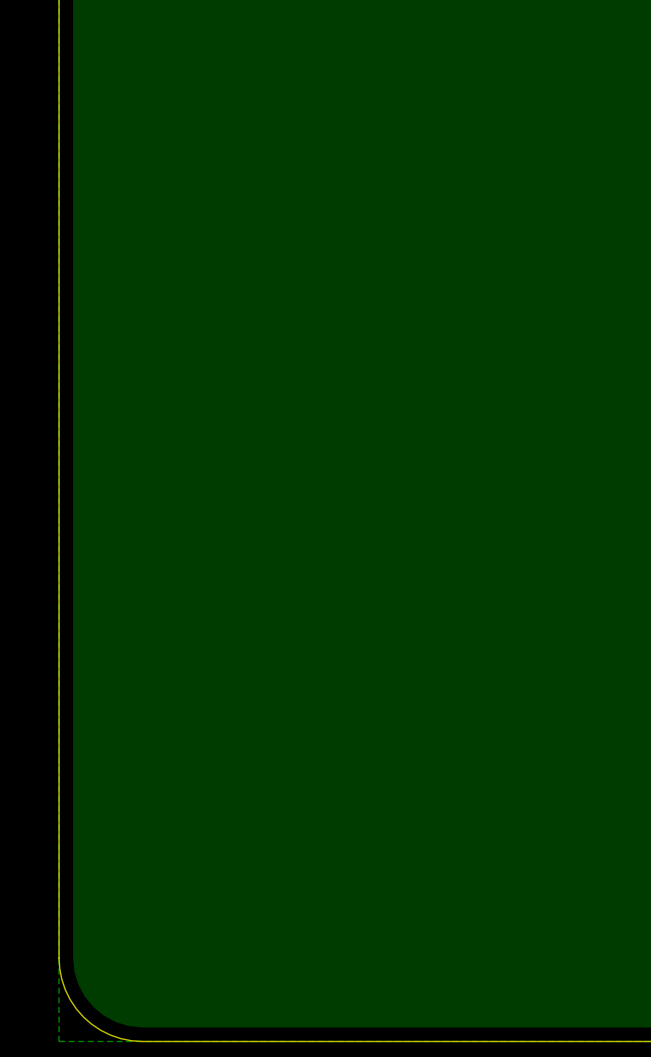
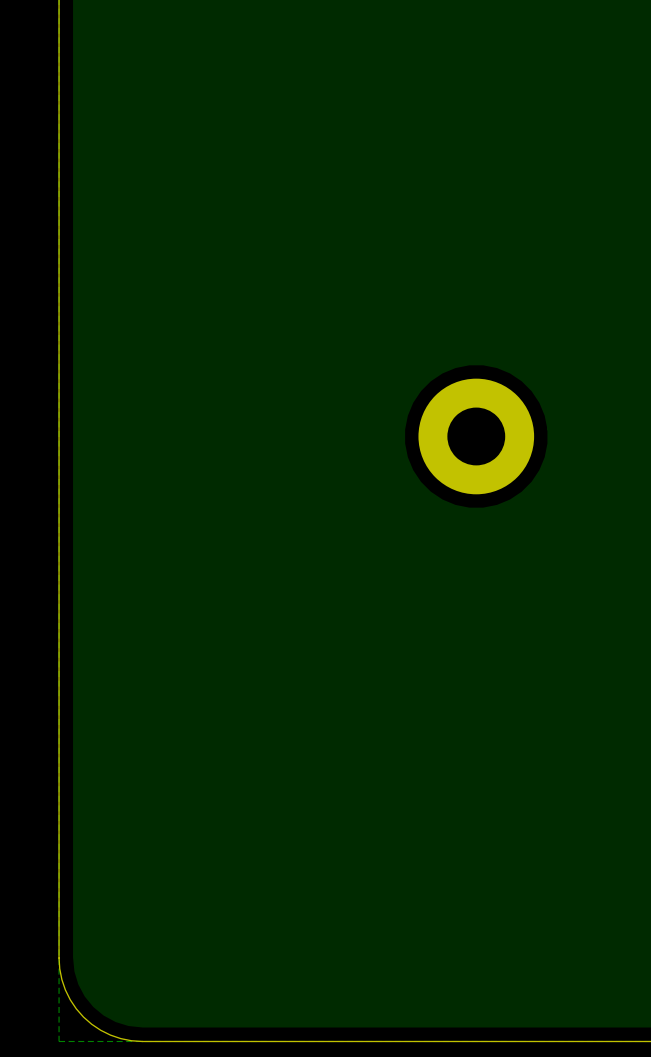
part: none -> (476, 436)

